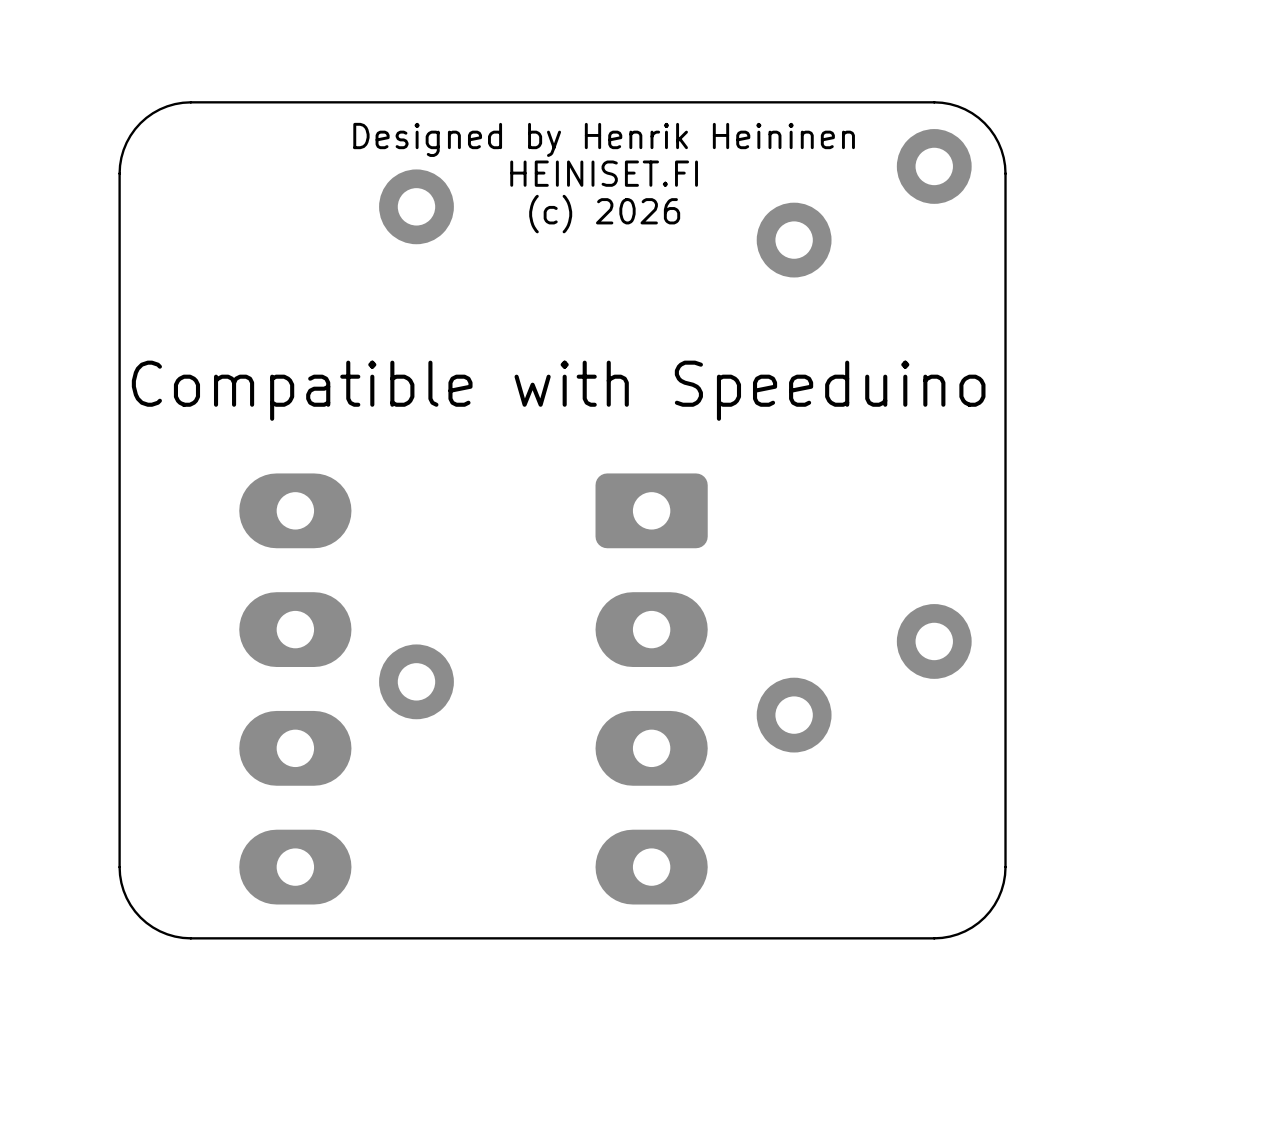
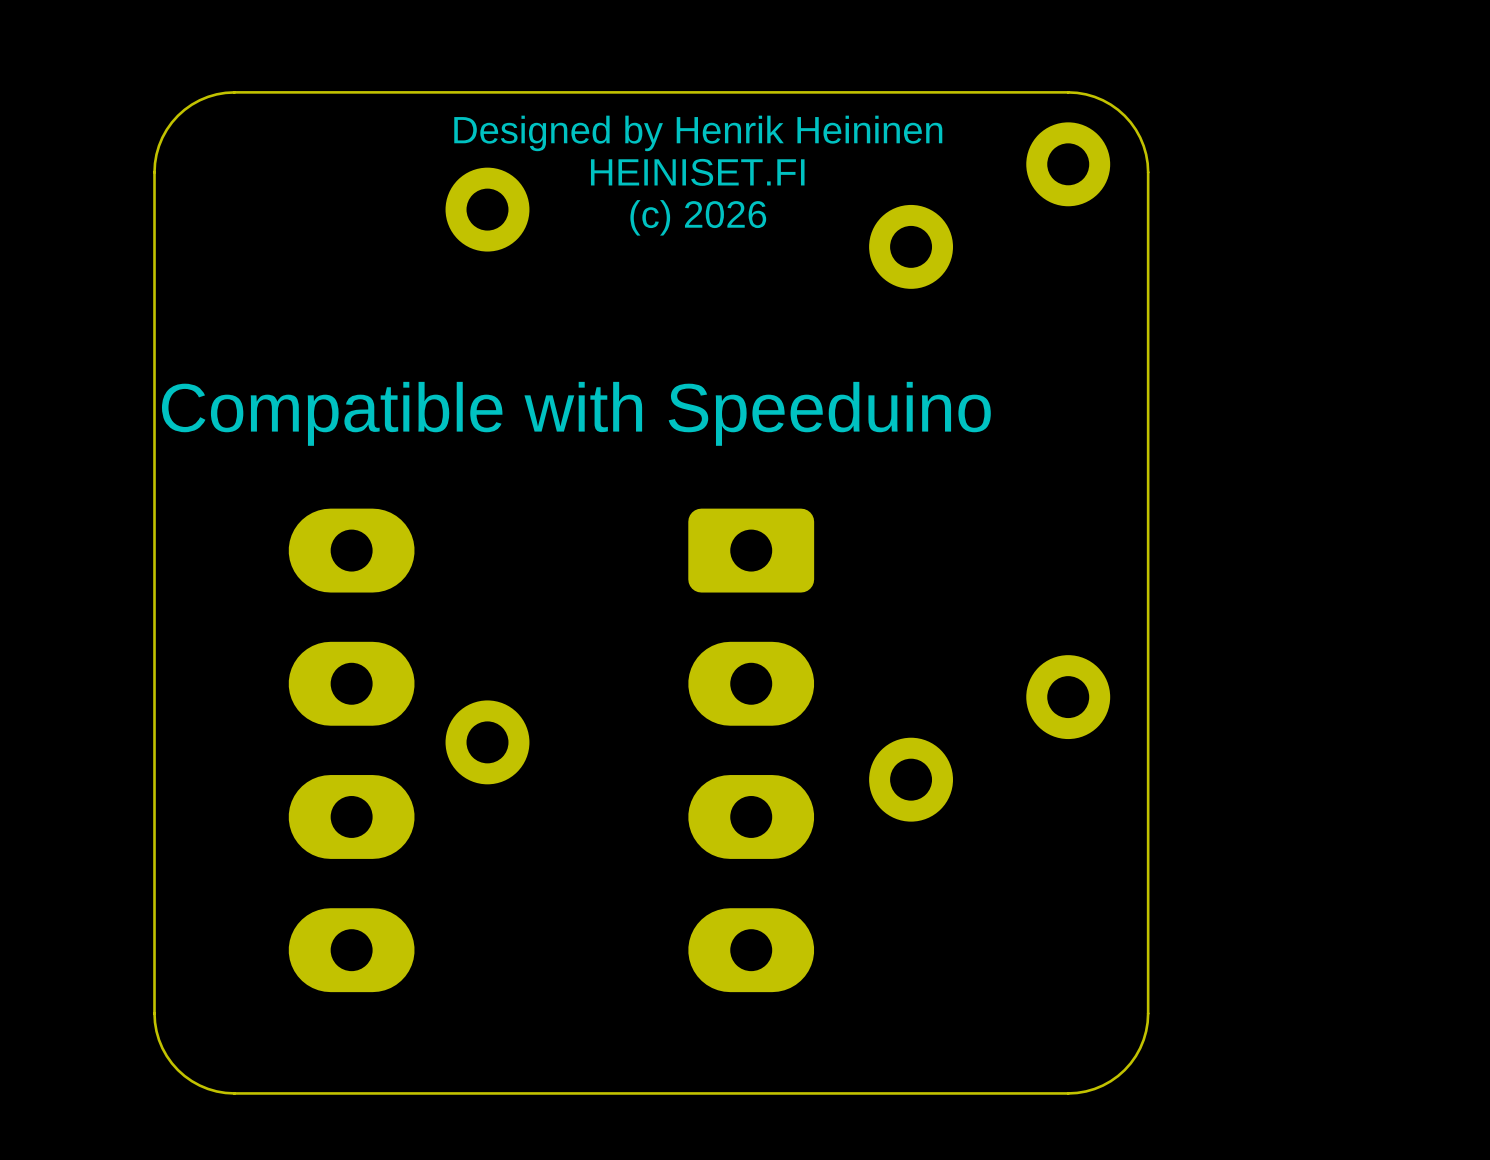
board edge: (1005, 867) (1001, 890) (994, 905) (984, 917) (965, 931) (950, 936) (934, 938) (182, 937) (159, 931) (140, 917) (130, 905) (123, 890) (119, 867) -> (1148, 950) (1147, 1022) (1143, 1039) (1135, 1056) (1124, 1070) (1110, 1081) (1086, 1091) (1068, 1093) (225, 1092) (208, 1088) (191, 1081) (177, 1070) (162, 1048) (155, 1022) (154, 950)

